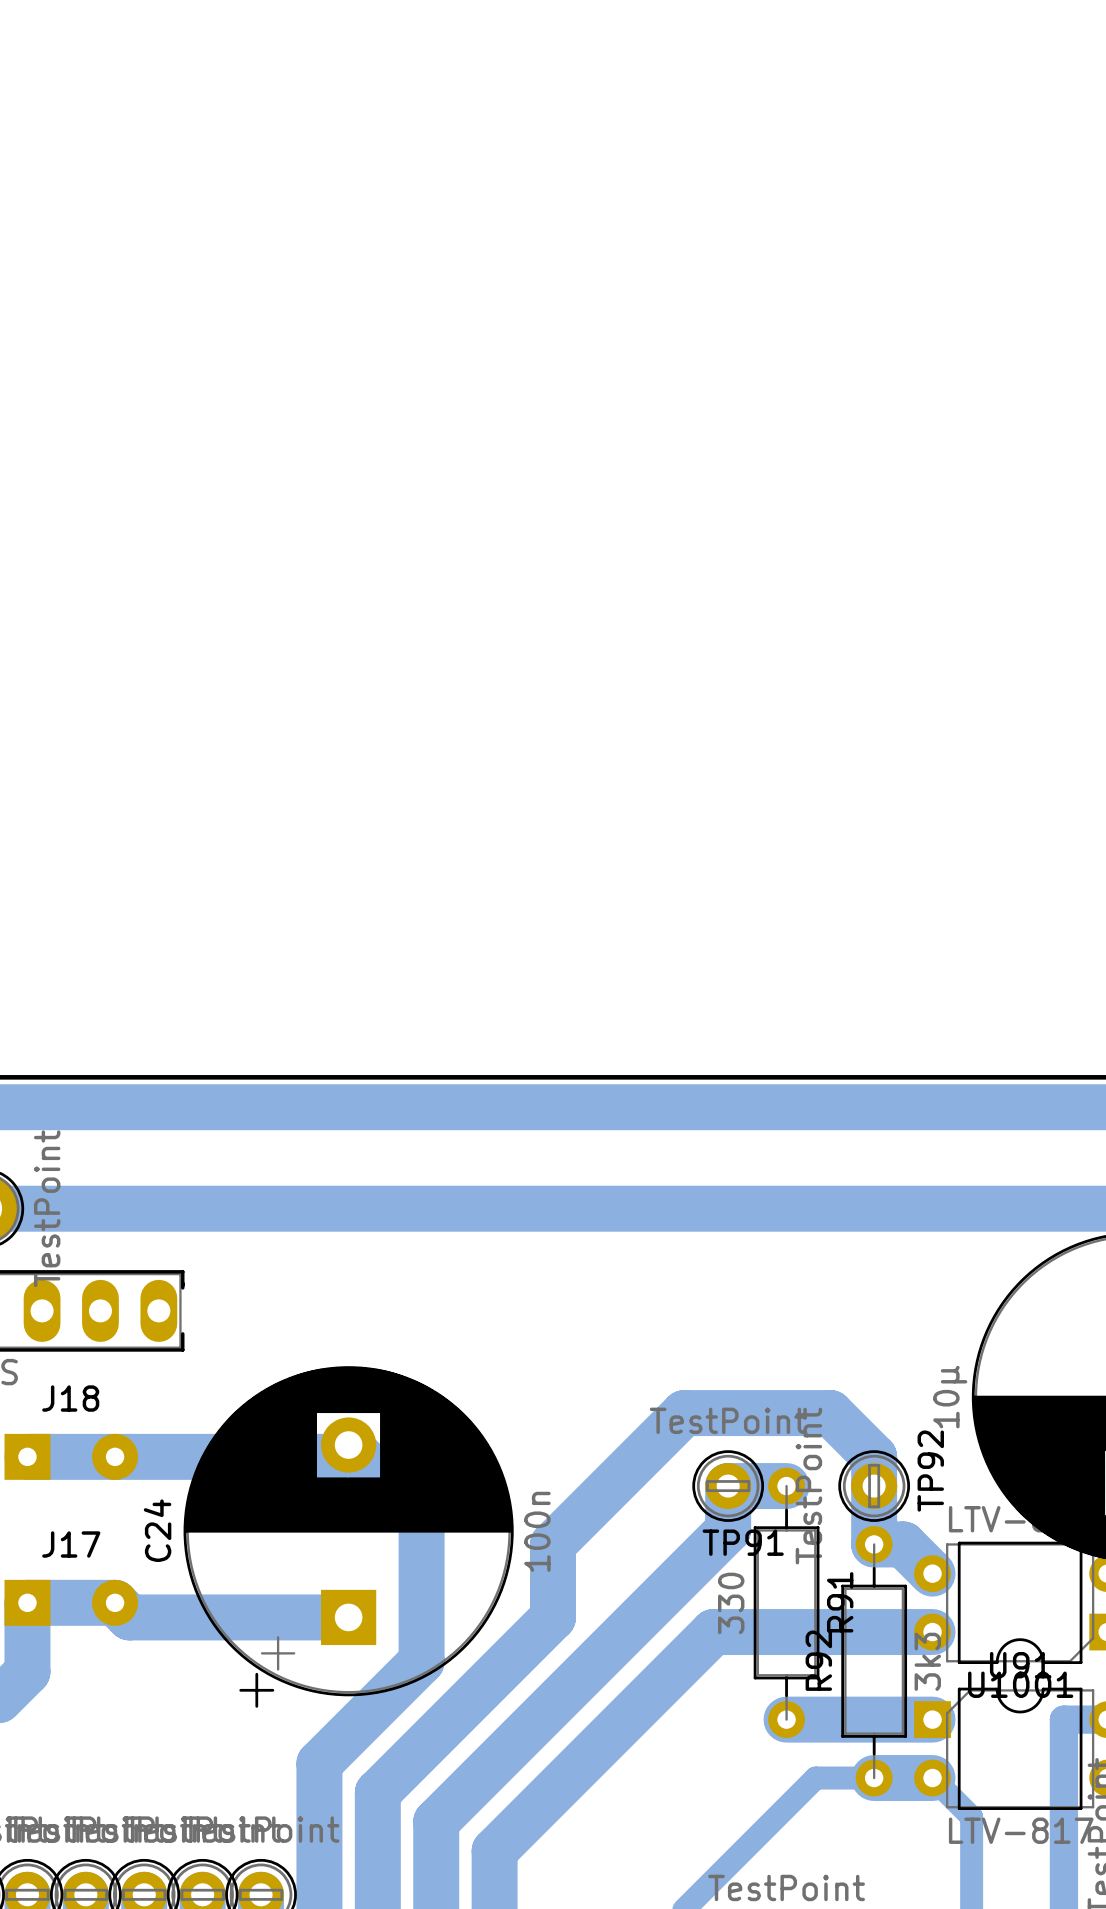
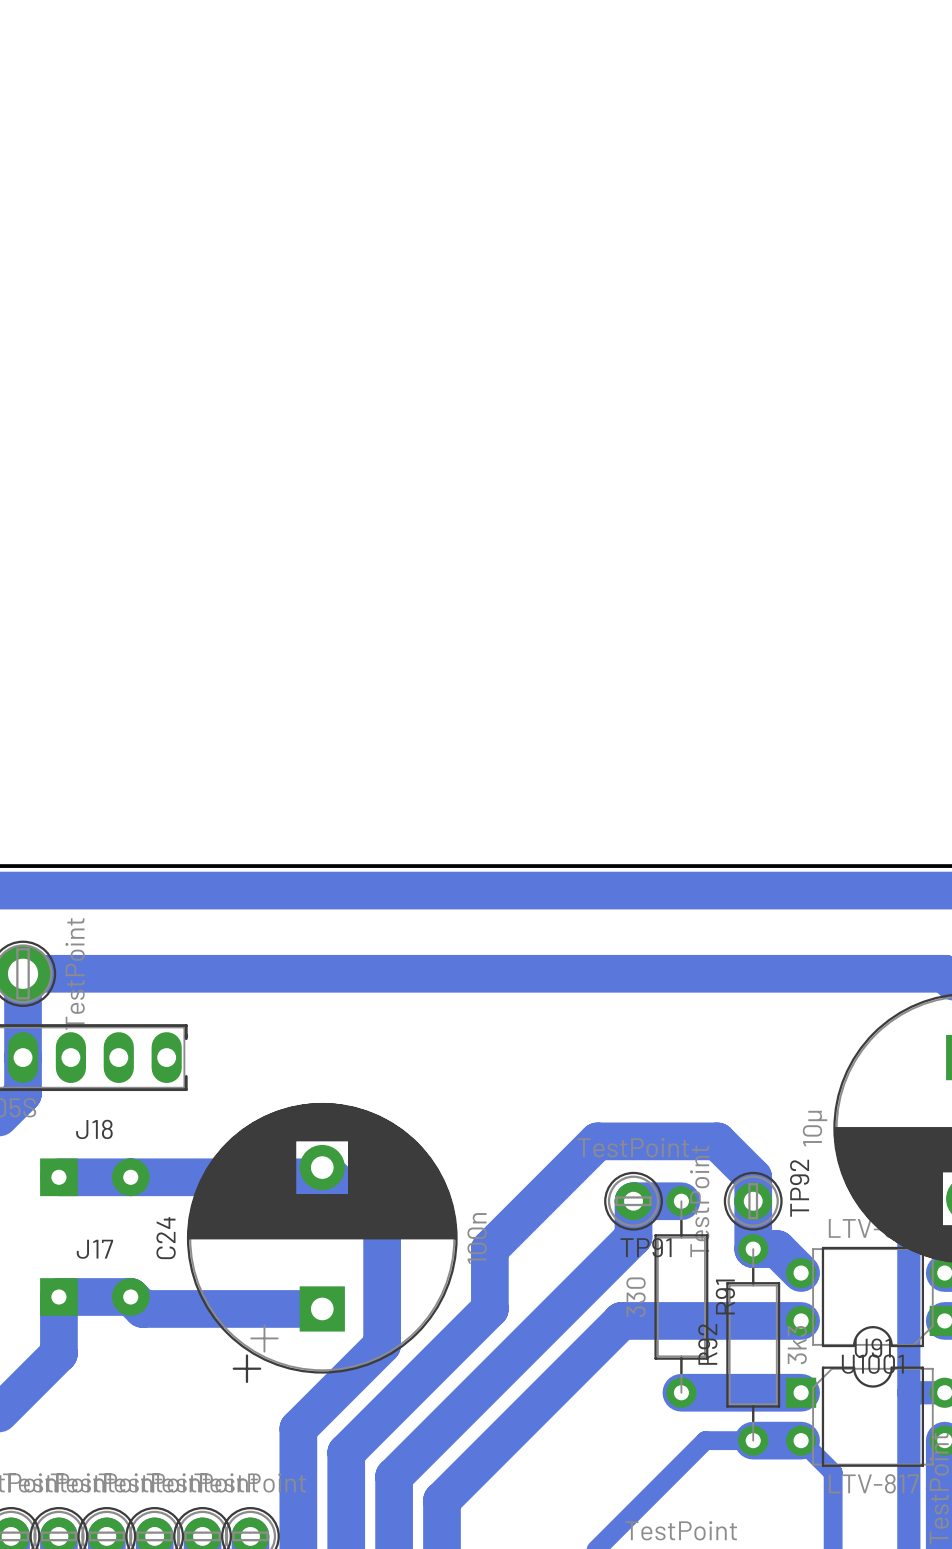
bottom track: none -> (908, 1225) (908, 1392)

